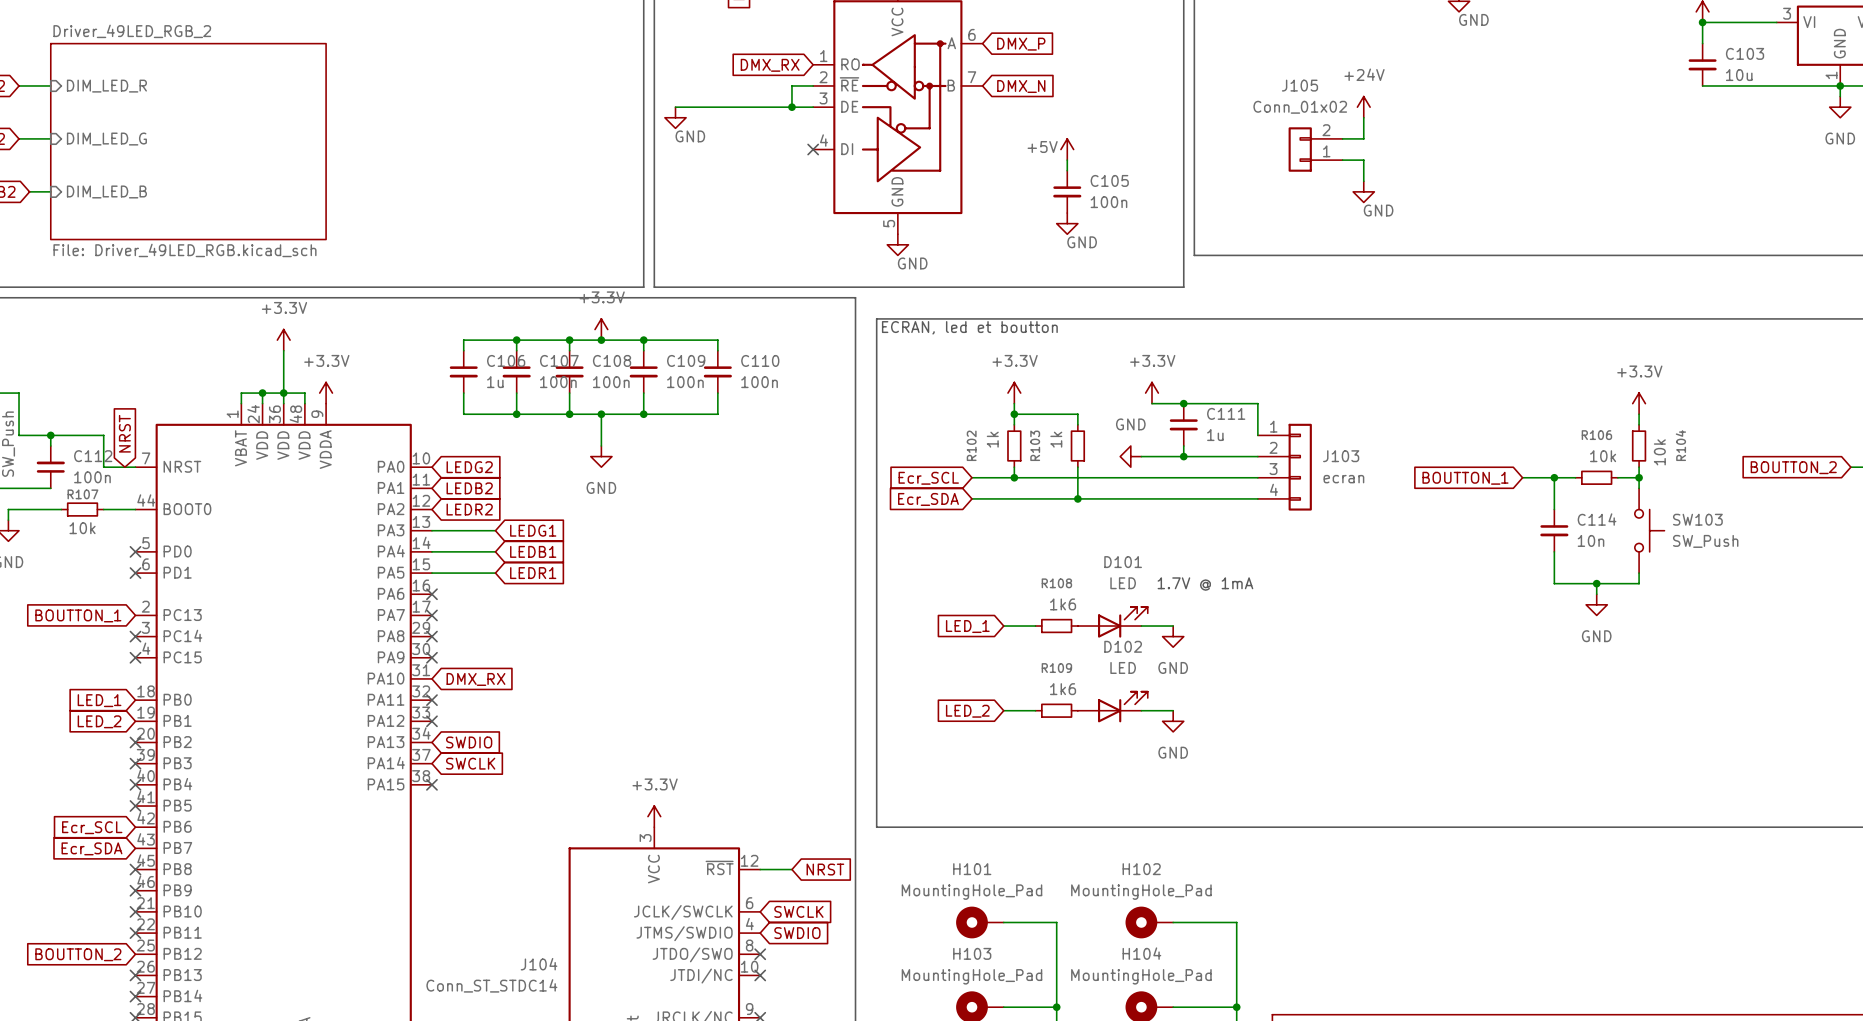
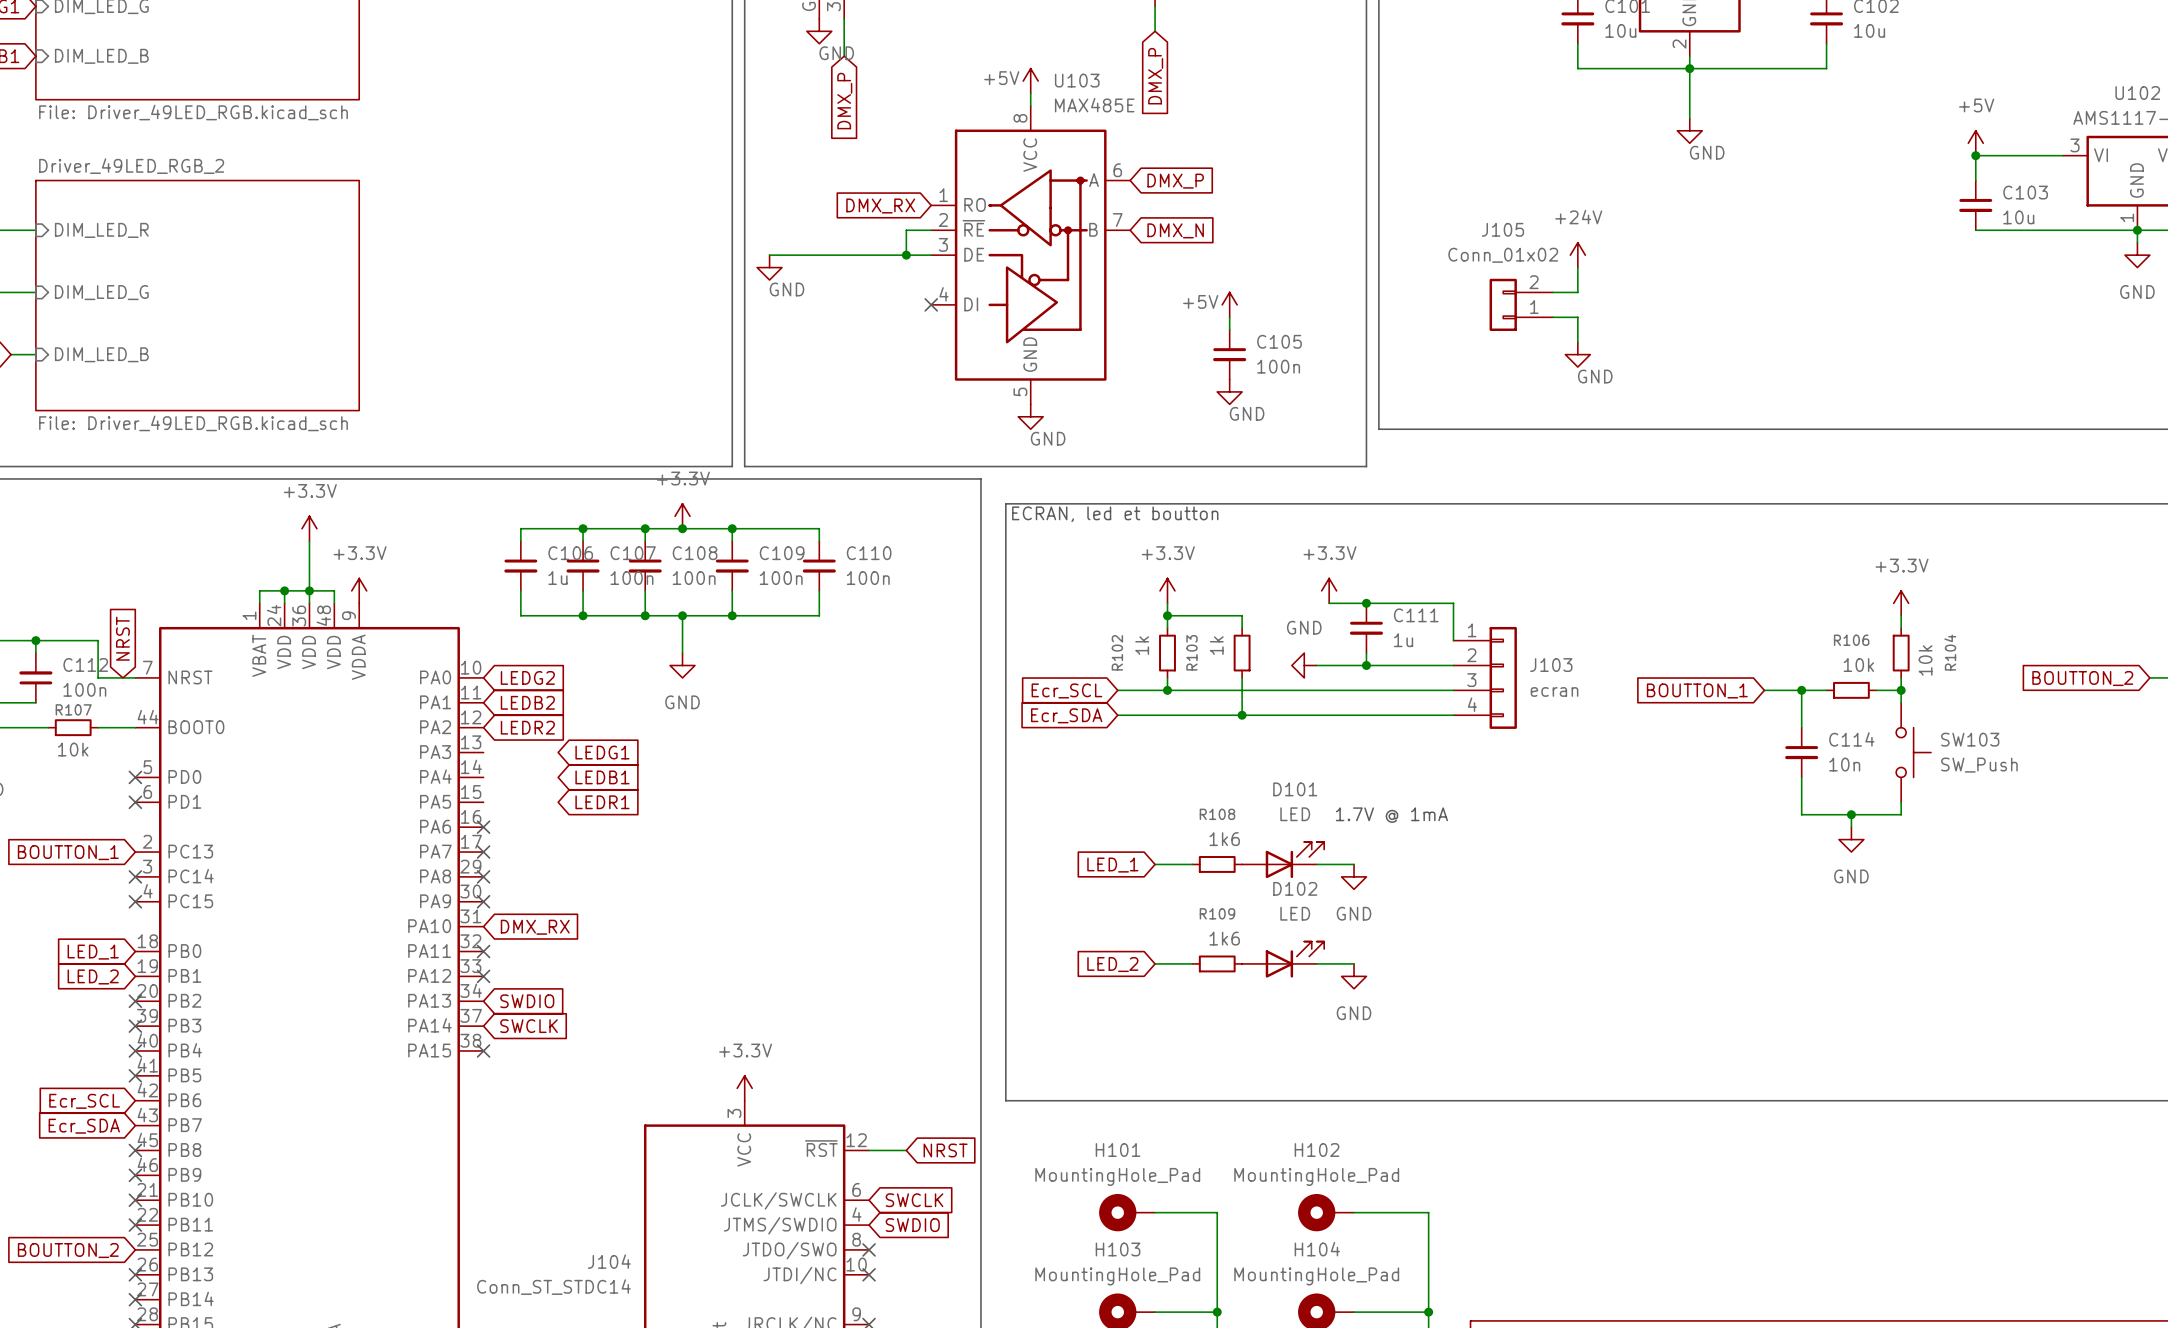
wire: (431, 530) (495, 530) -> none
wire: (431, 551) (495, 551) -> none
wire: (431, 573) (495, 573) -> none

